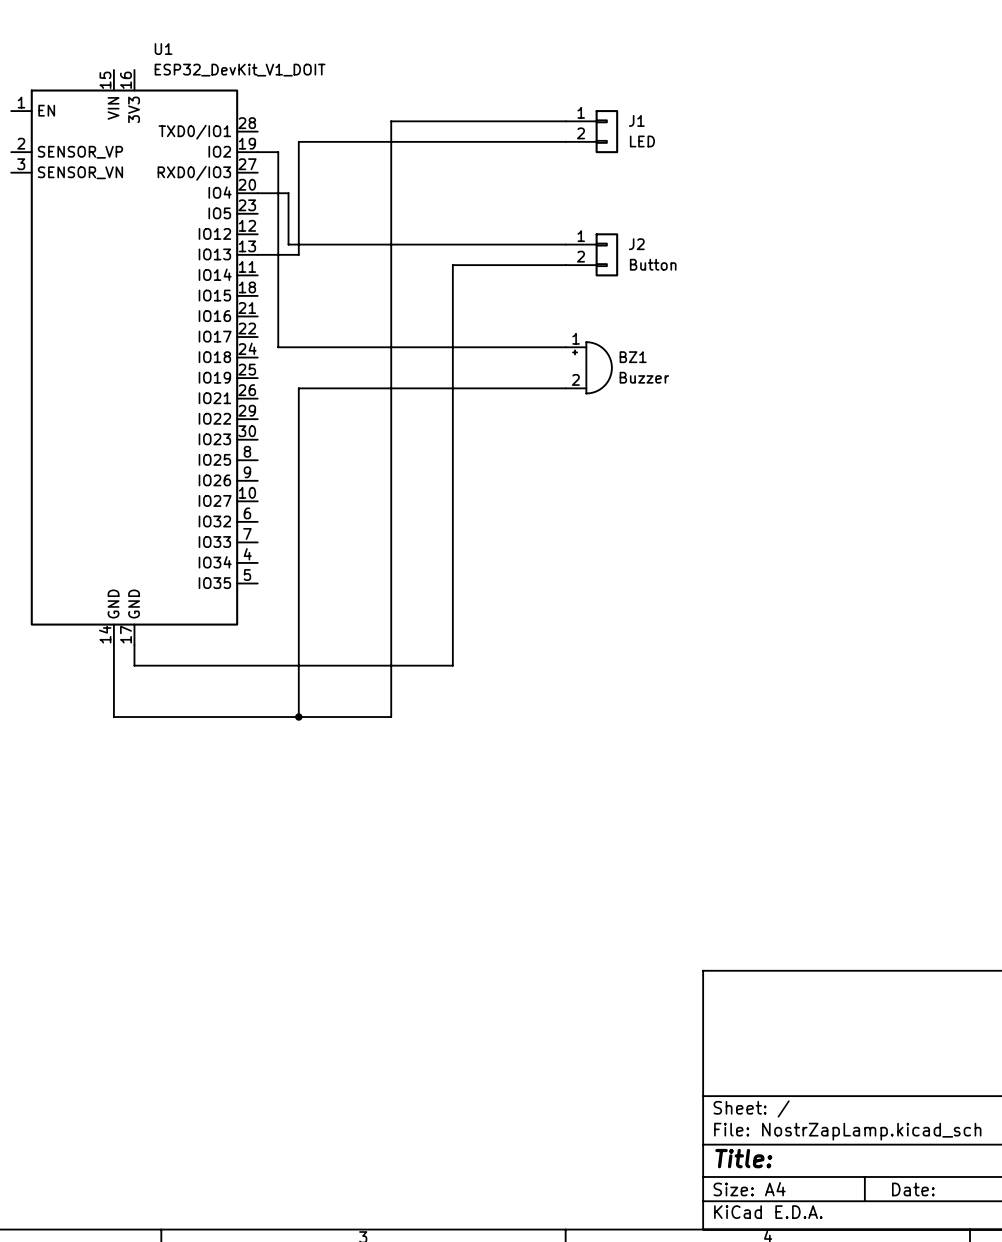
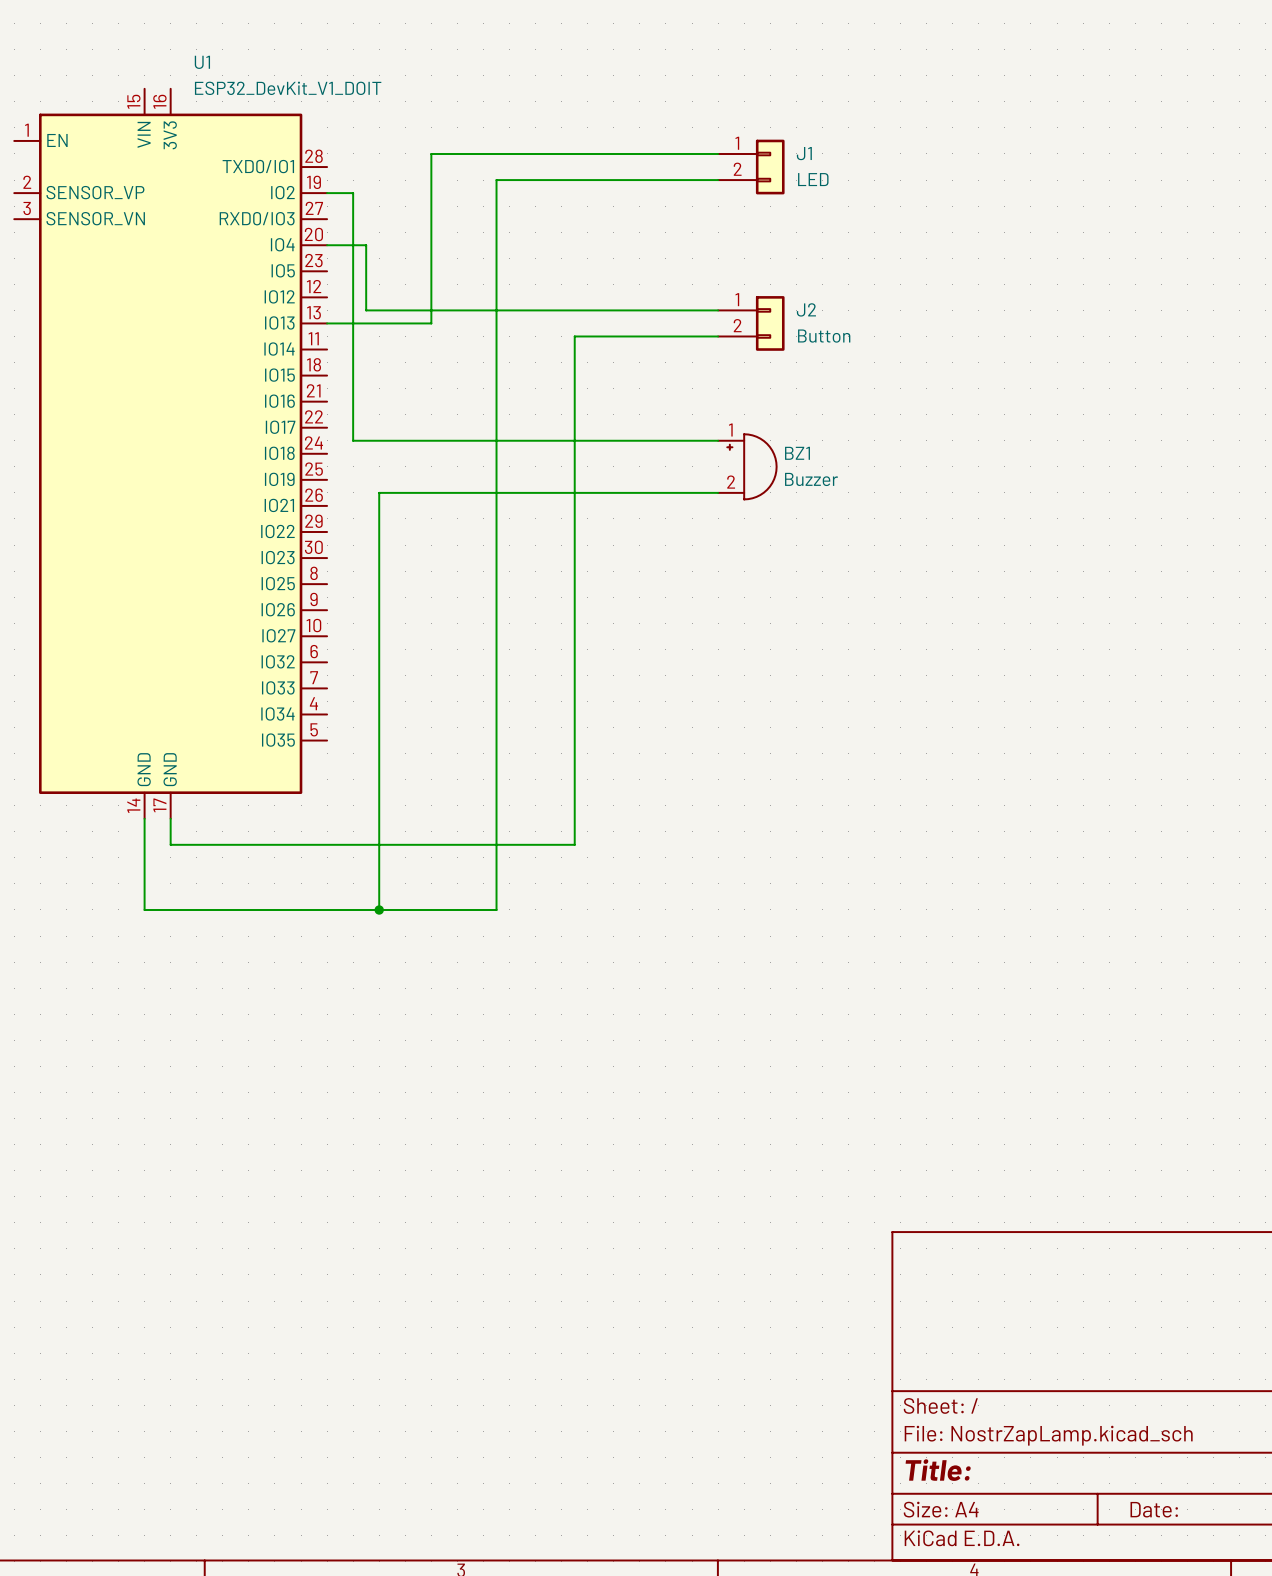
wire: (391, 121) (391, 141) (298, 141) (298, 254) -> (496, 153) (431, 153) (431, 323) (379, 323)

